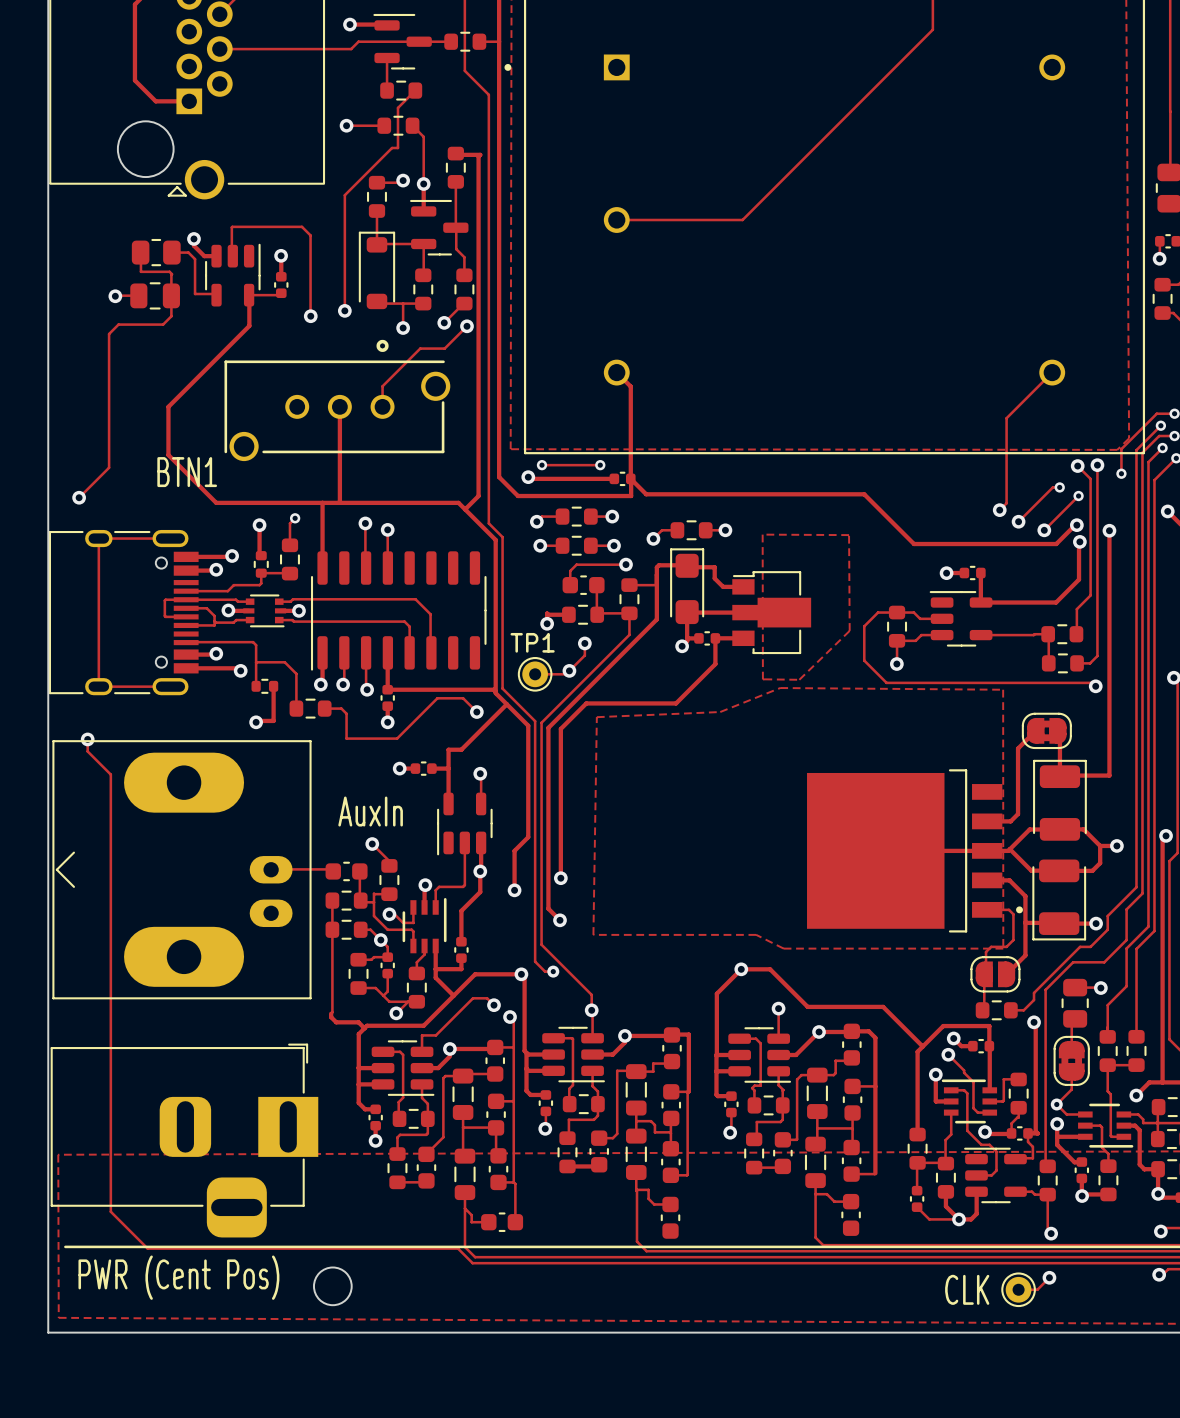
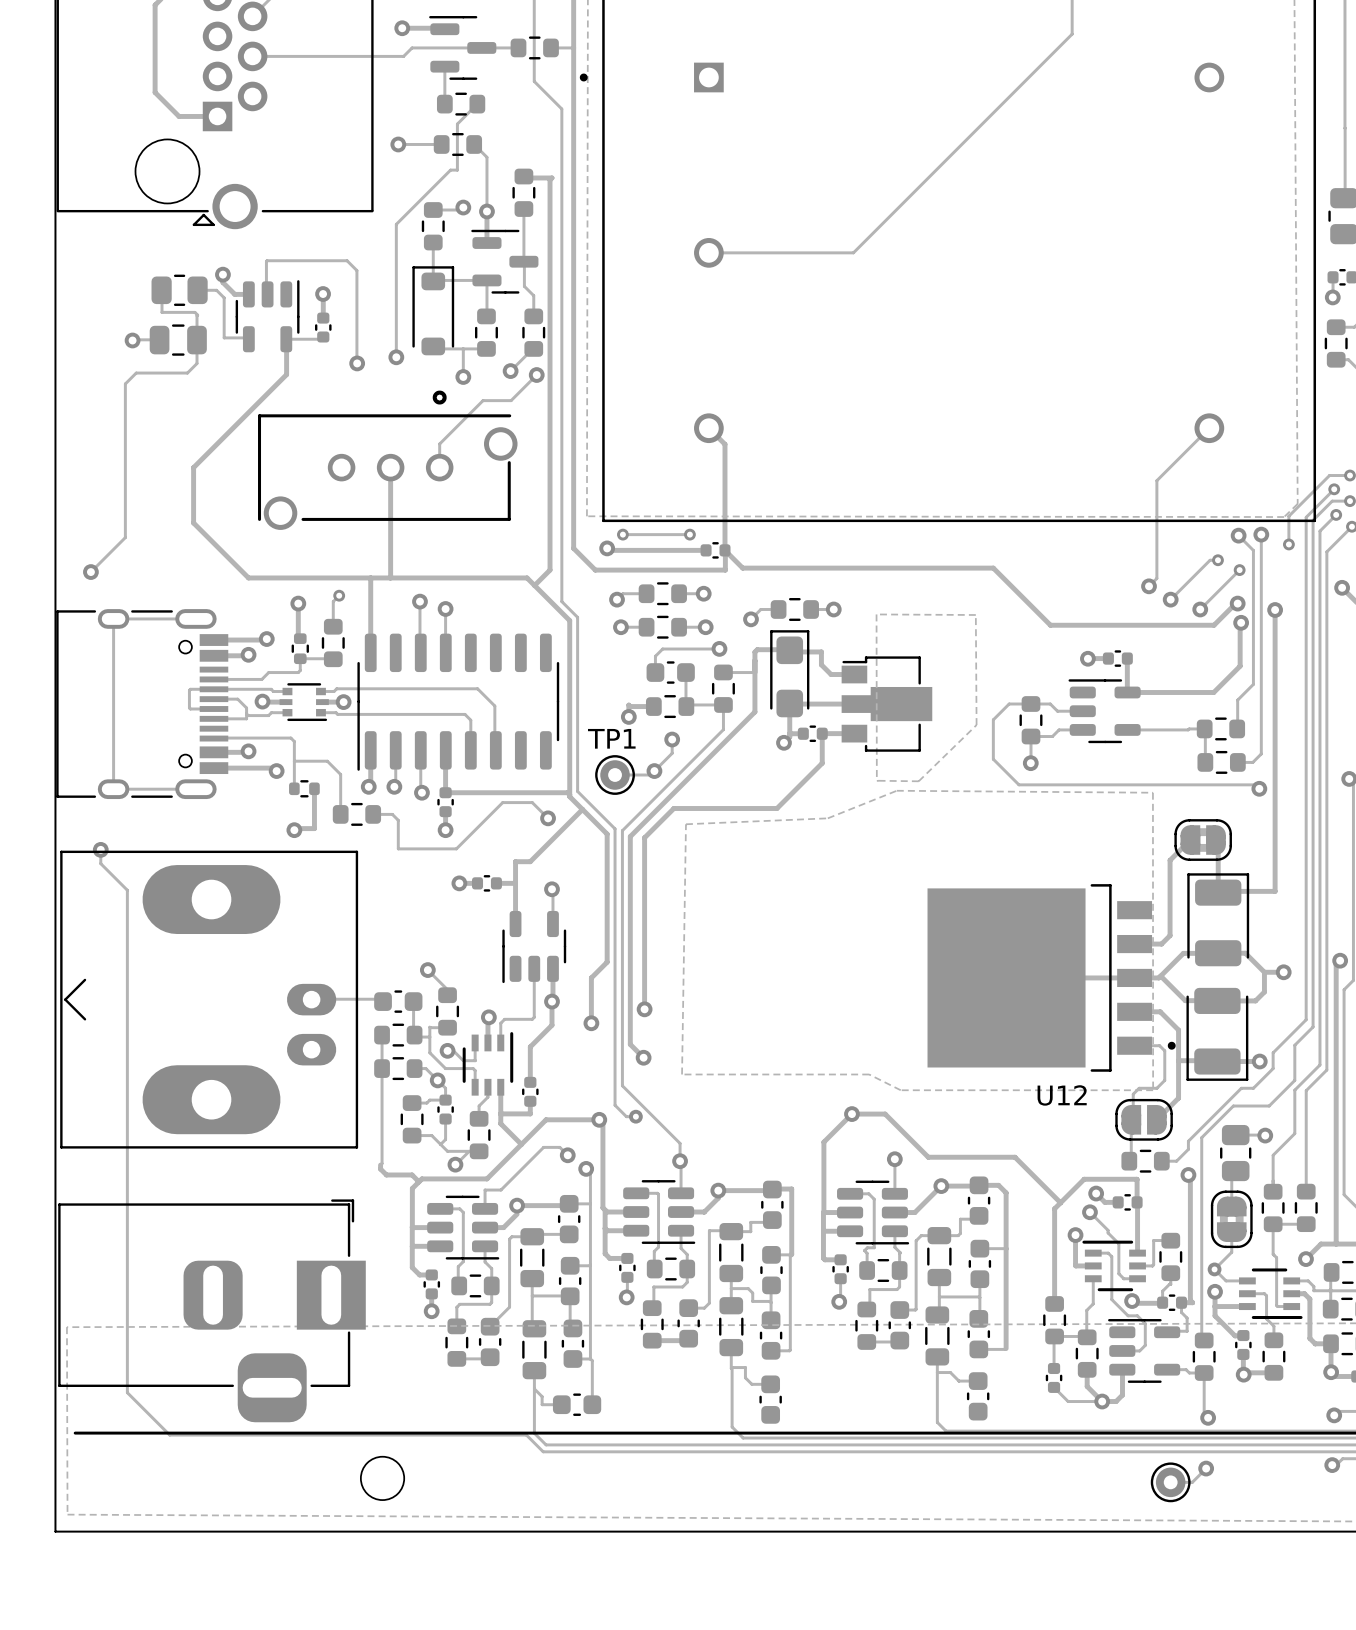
text: BTN1 (187, 472) -> none
text: AuxIn (370, 811) -> none
U12 name: none -> U12 (1062, 1095)
text: PWR (Cent Pos) (178, 1277) -> none
text: CLK (967, 1289) -> none

